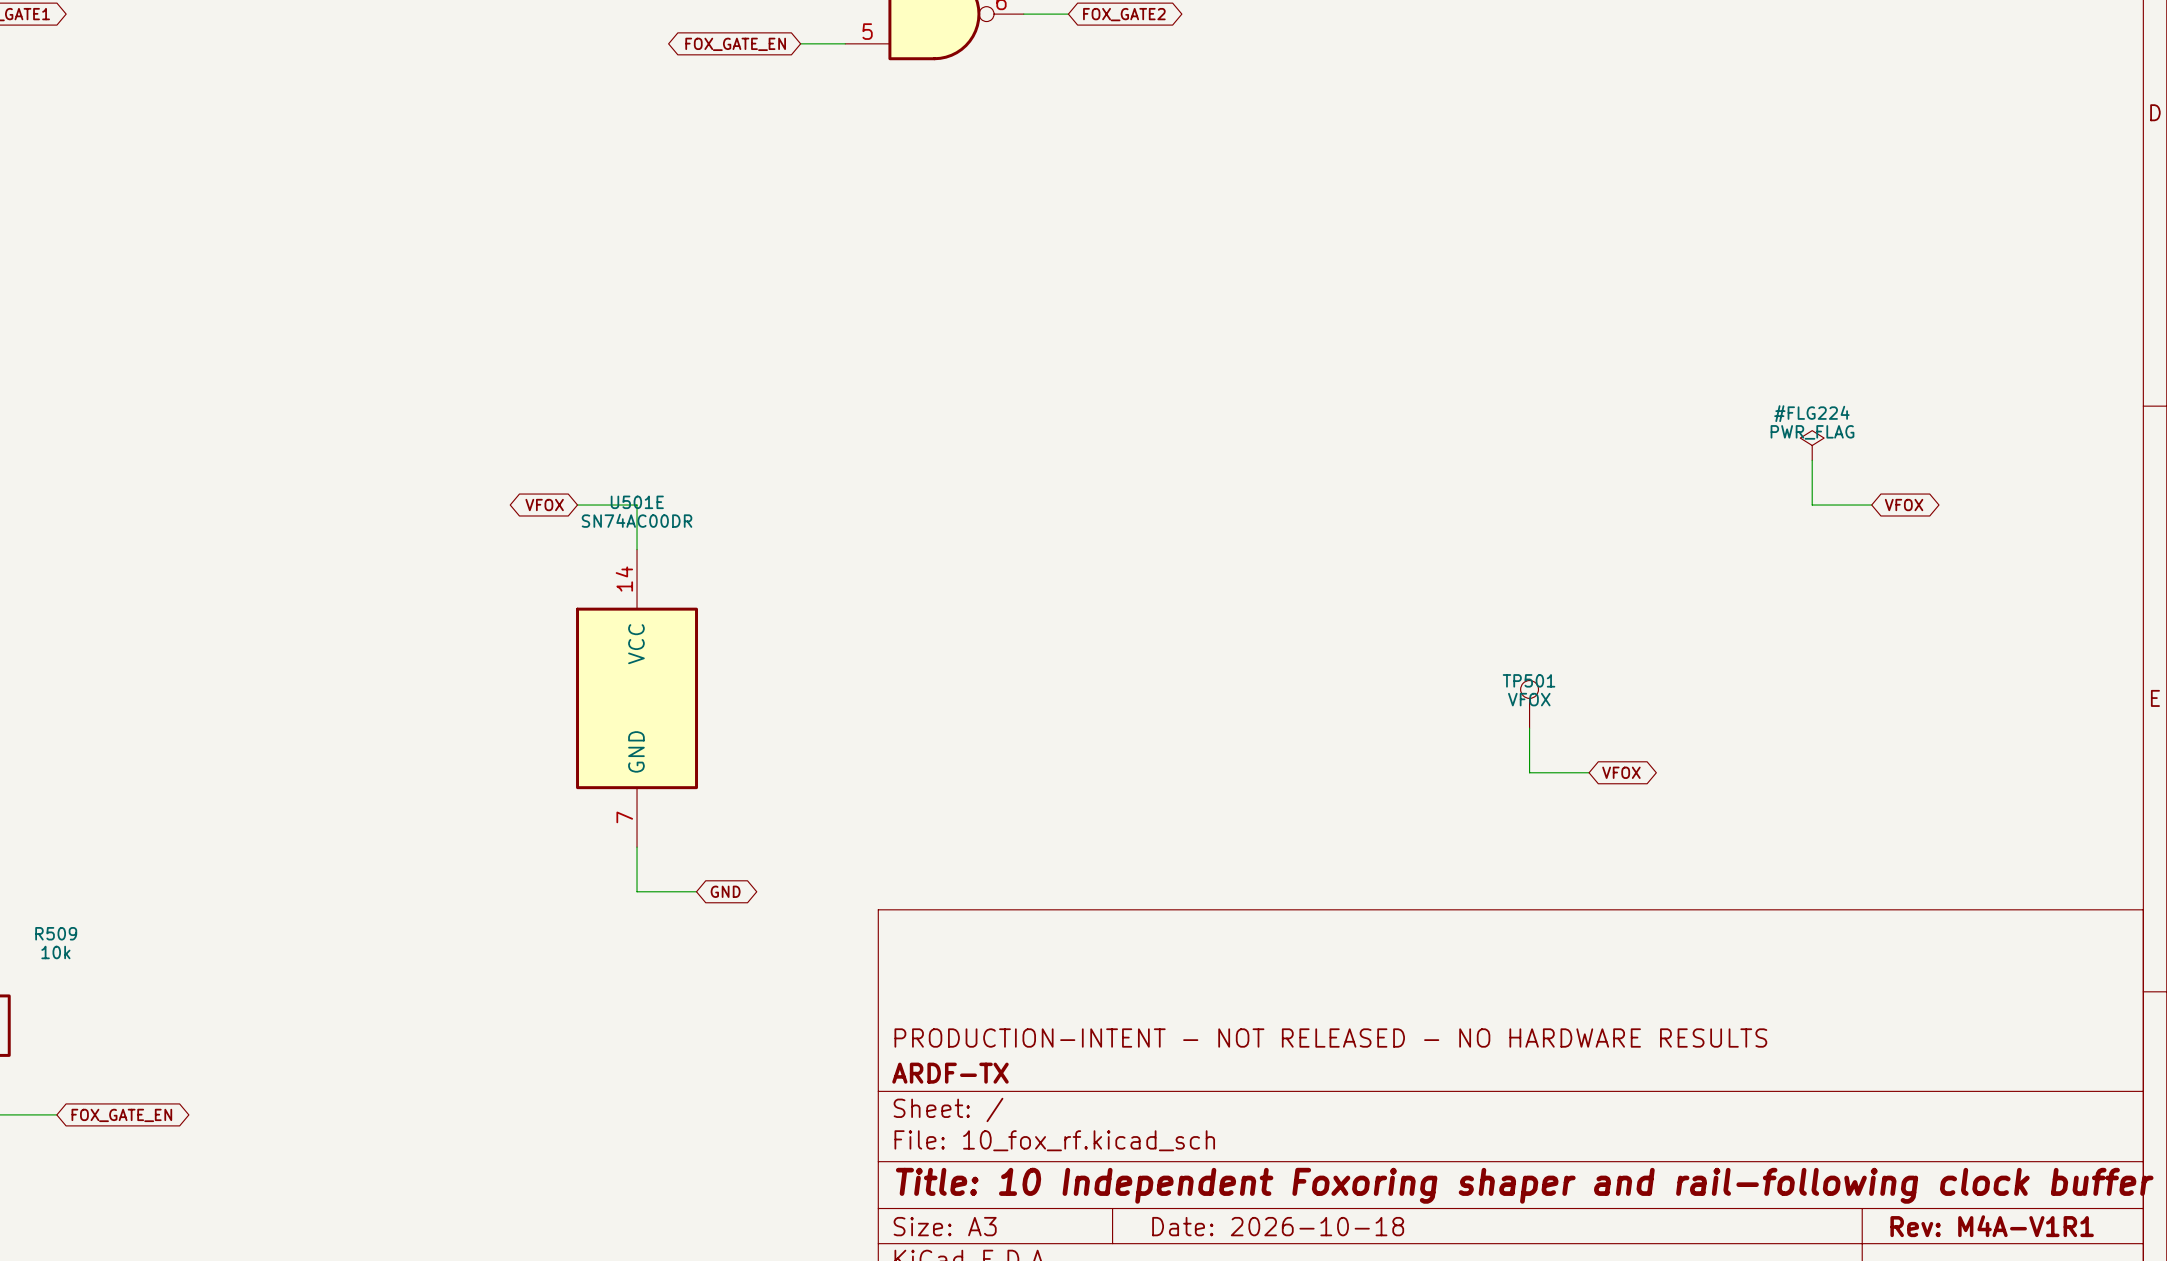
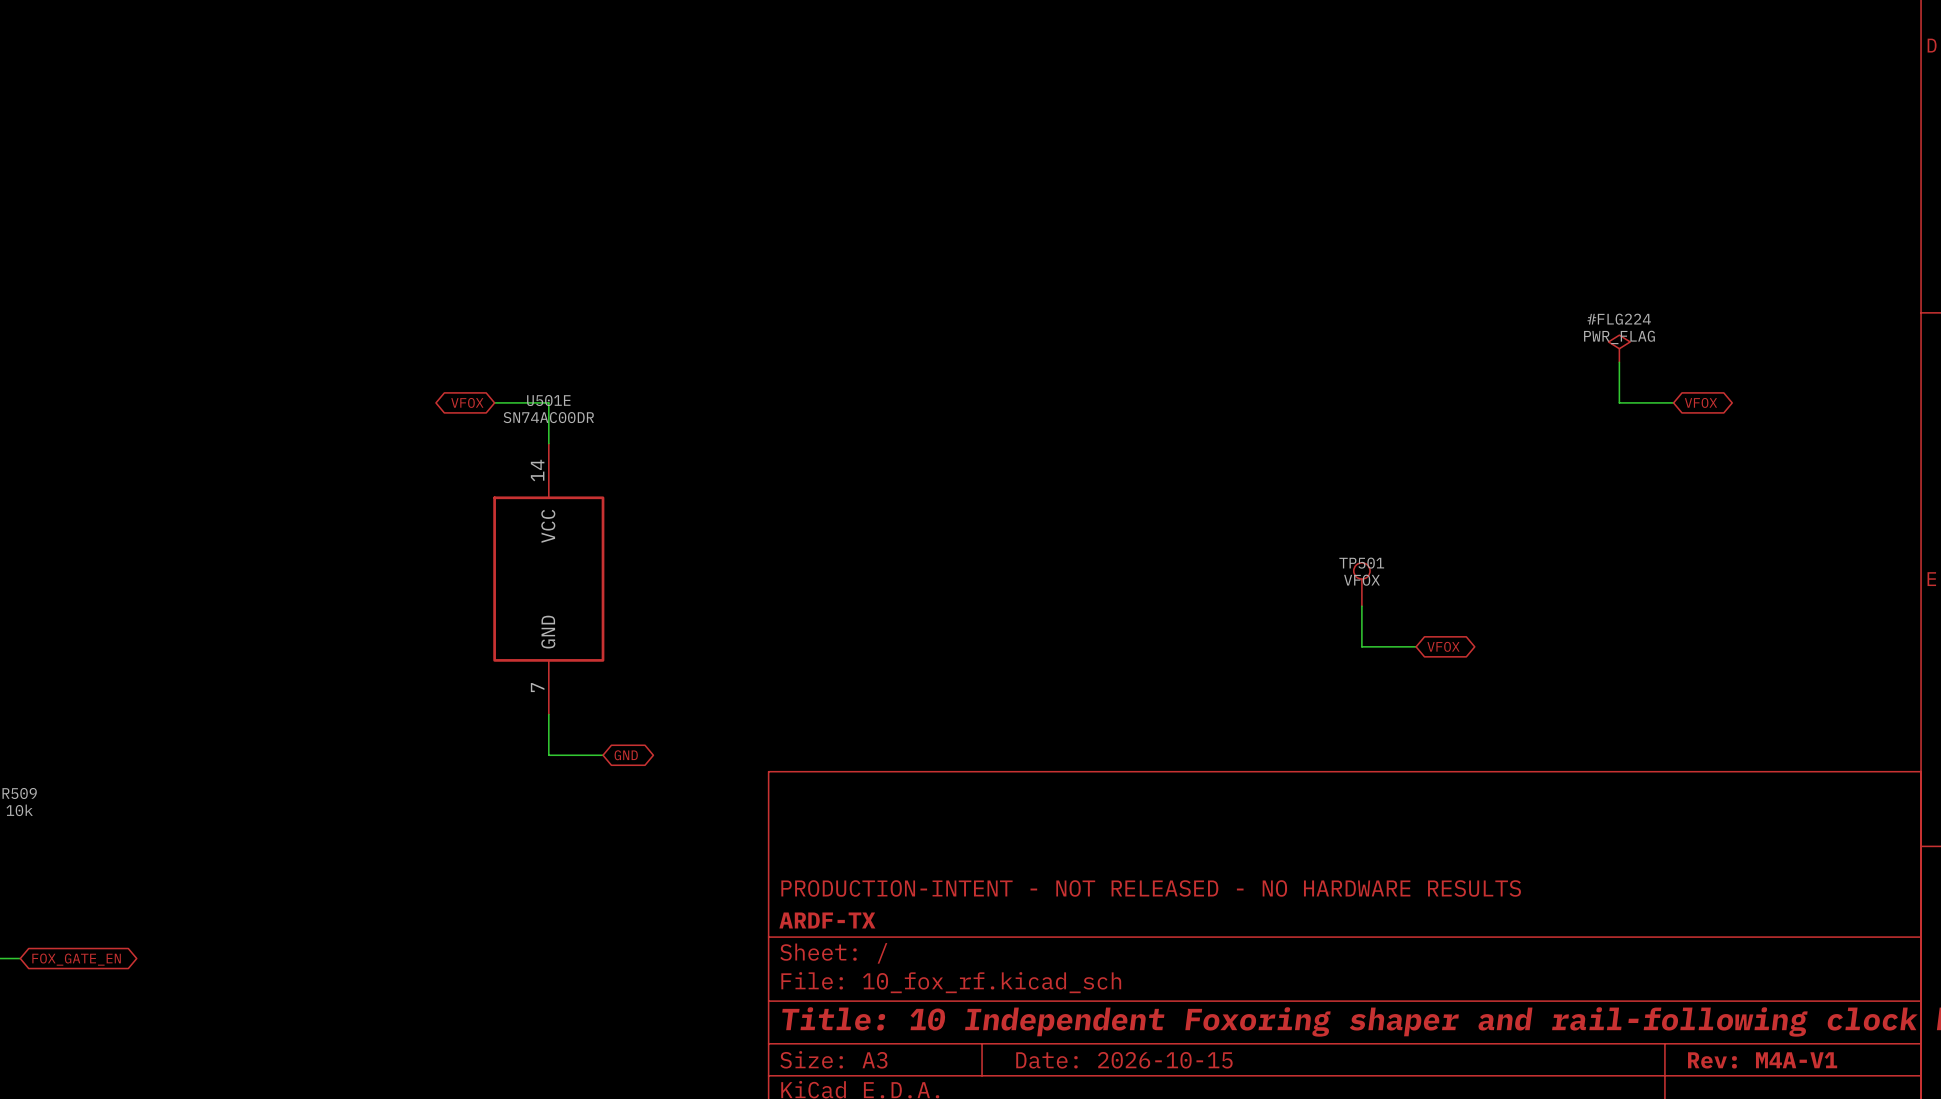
title block: Date: 2026-10-18 (1278, 1226) -> Date: 2026-10-15 (1124, 1060)
title block: Rev: M4A-V1R1 (1992, 1226) -> Rev: M4A-V1 (1762, 1060)

